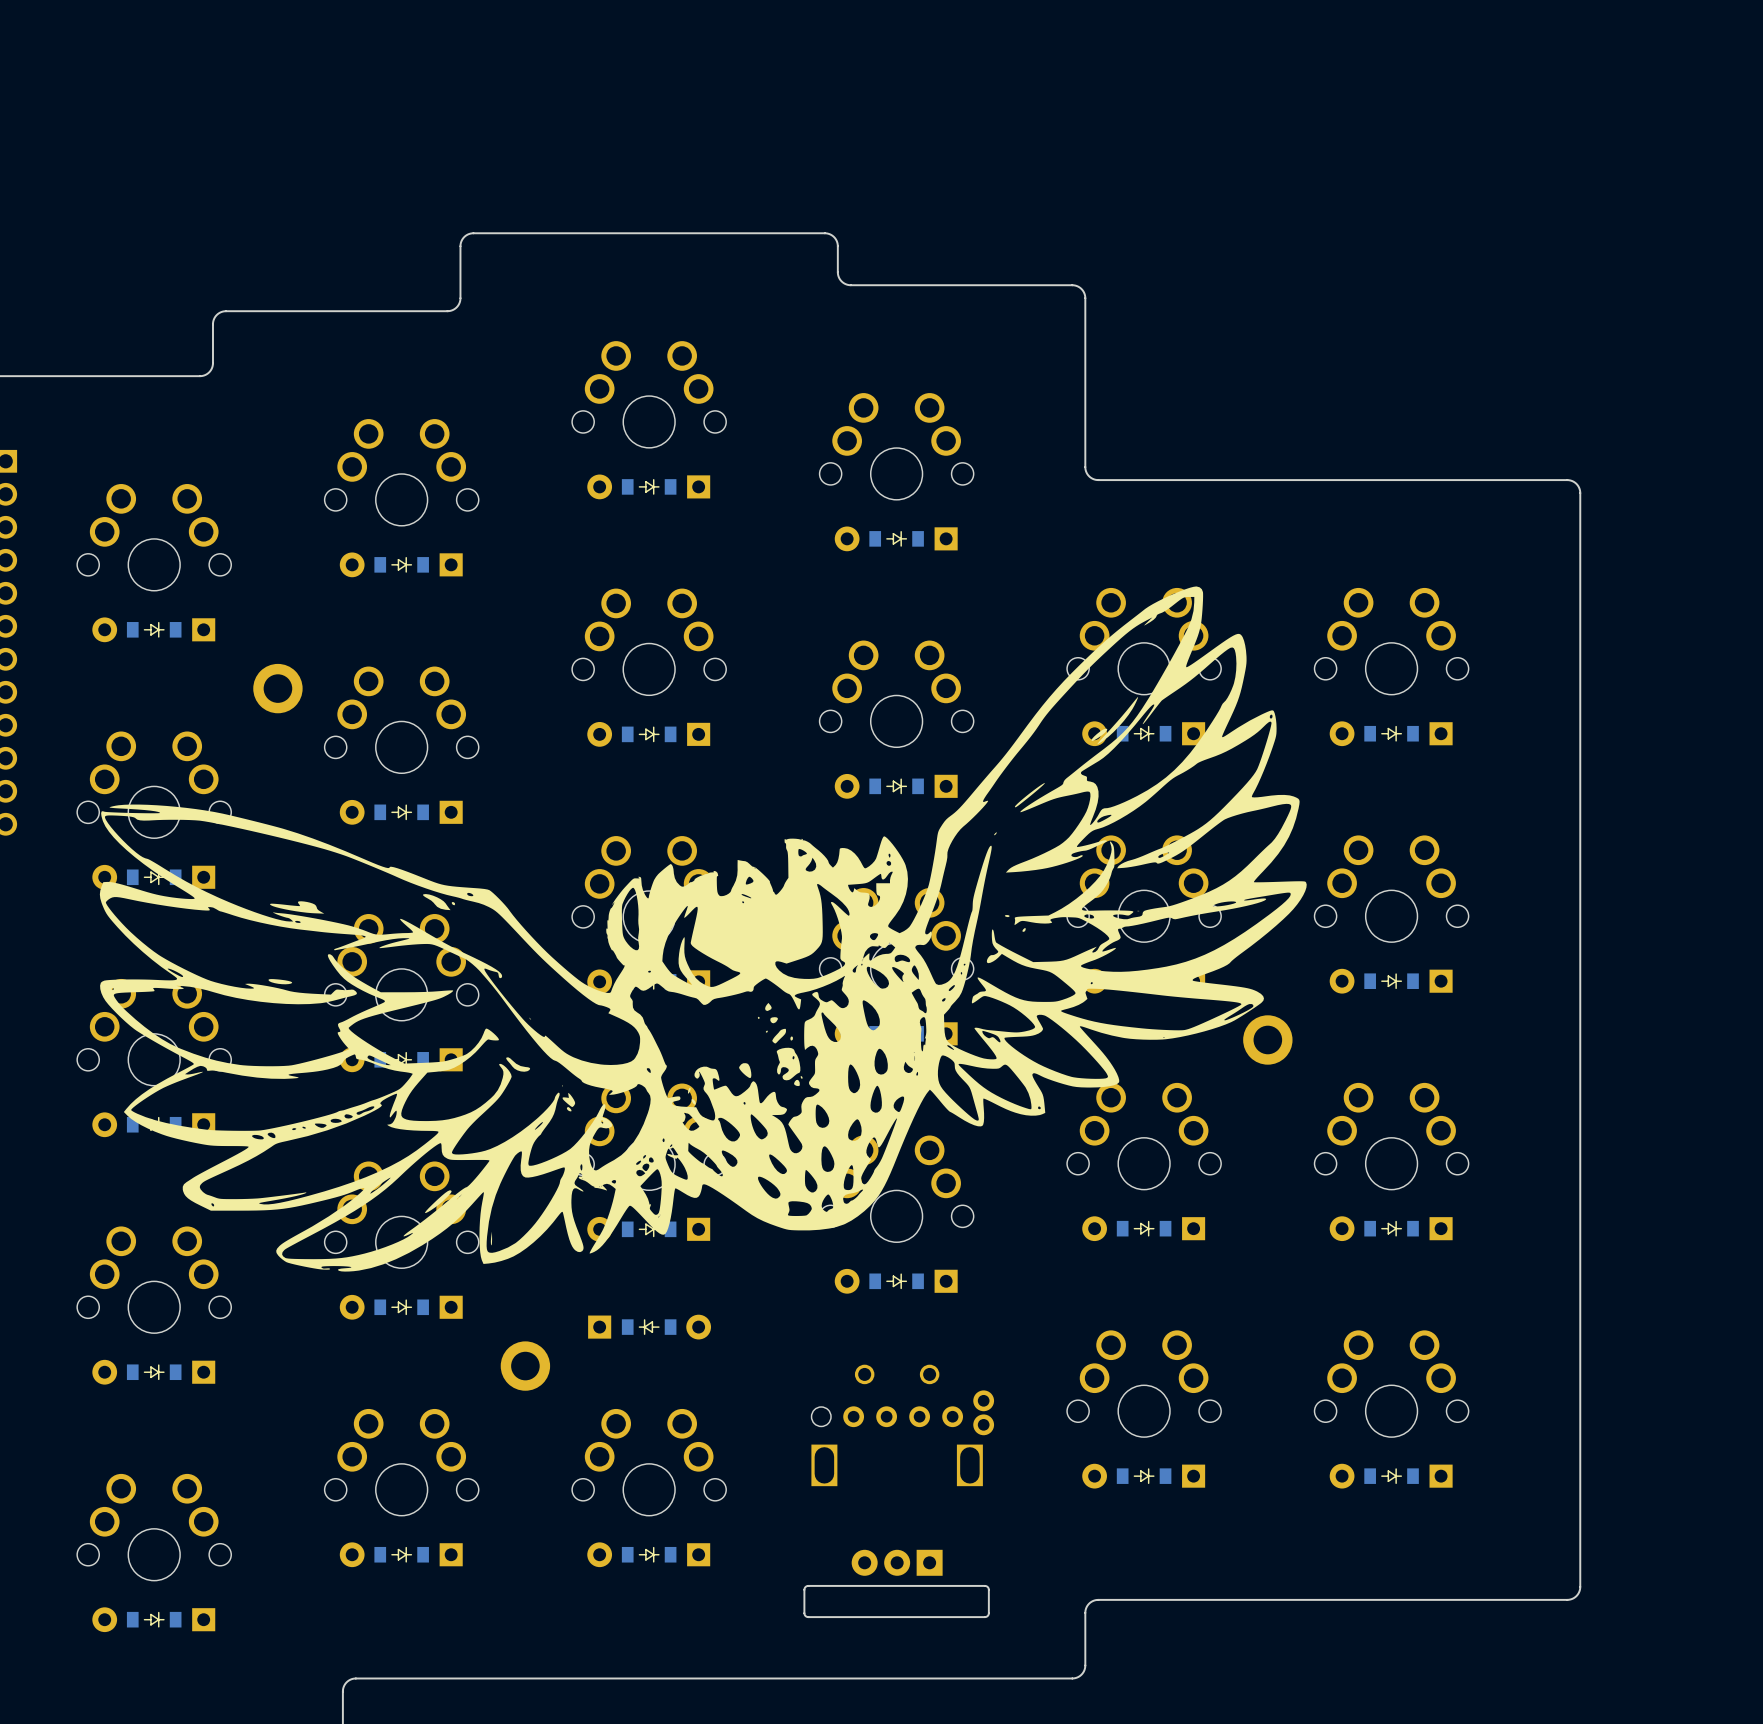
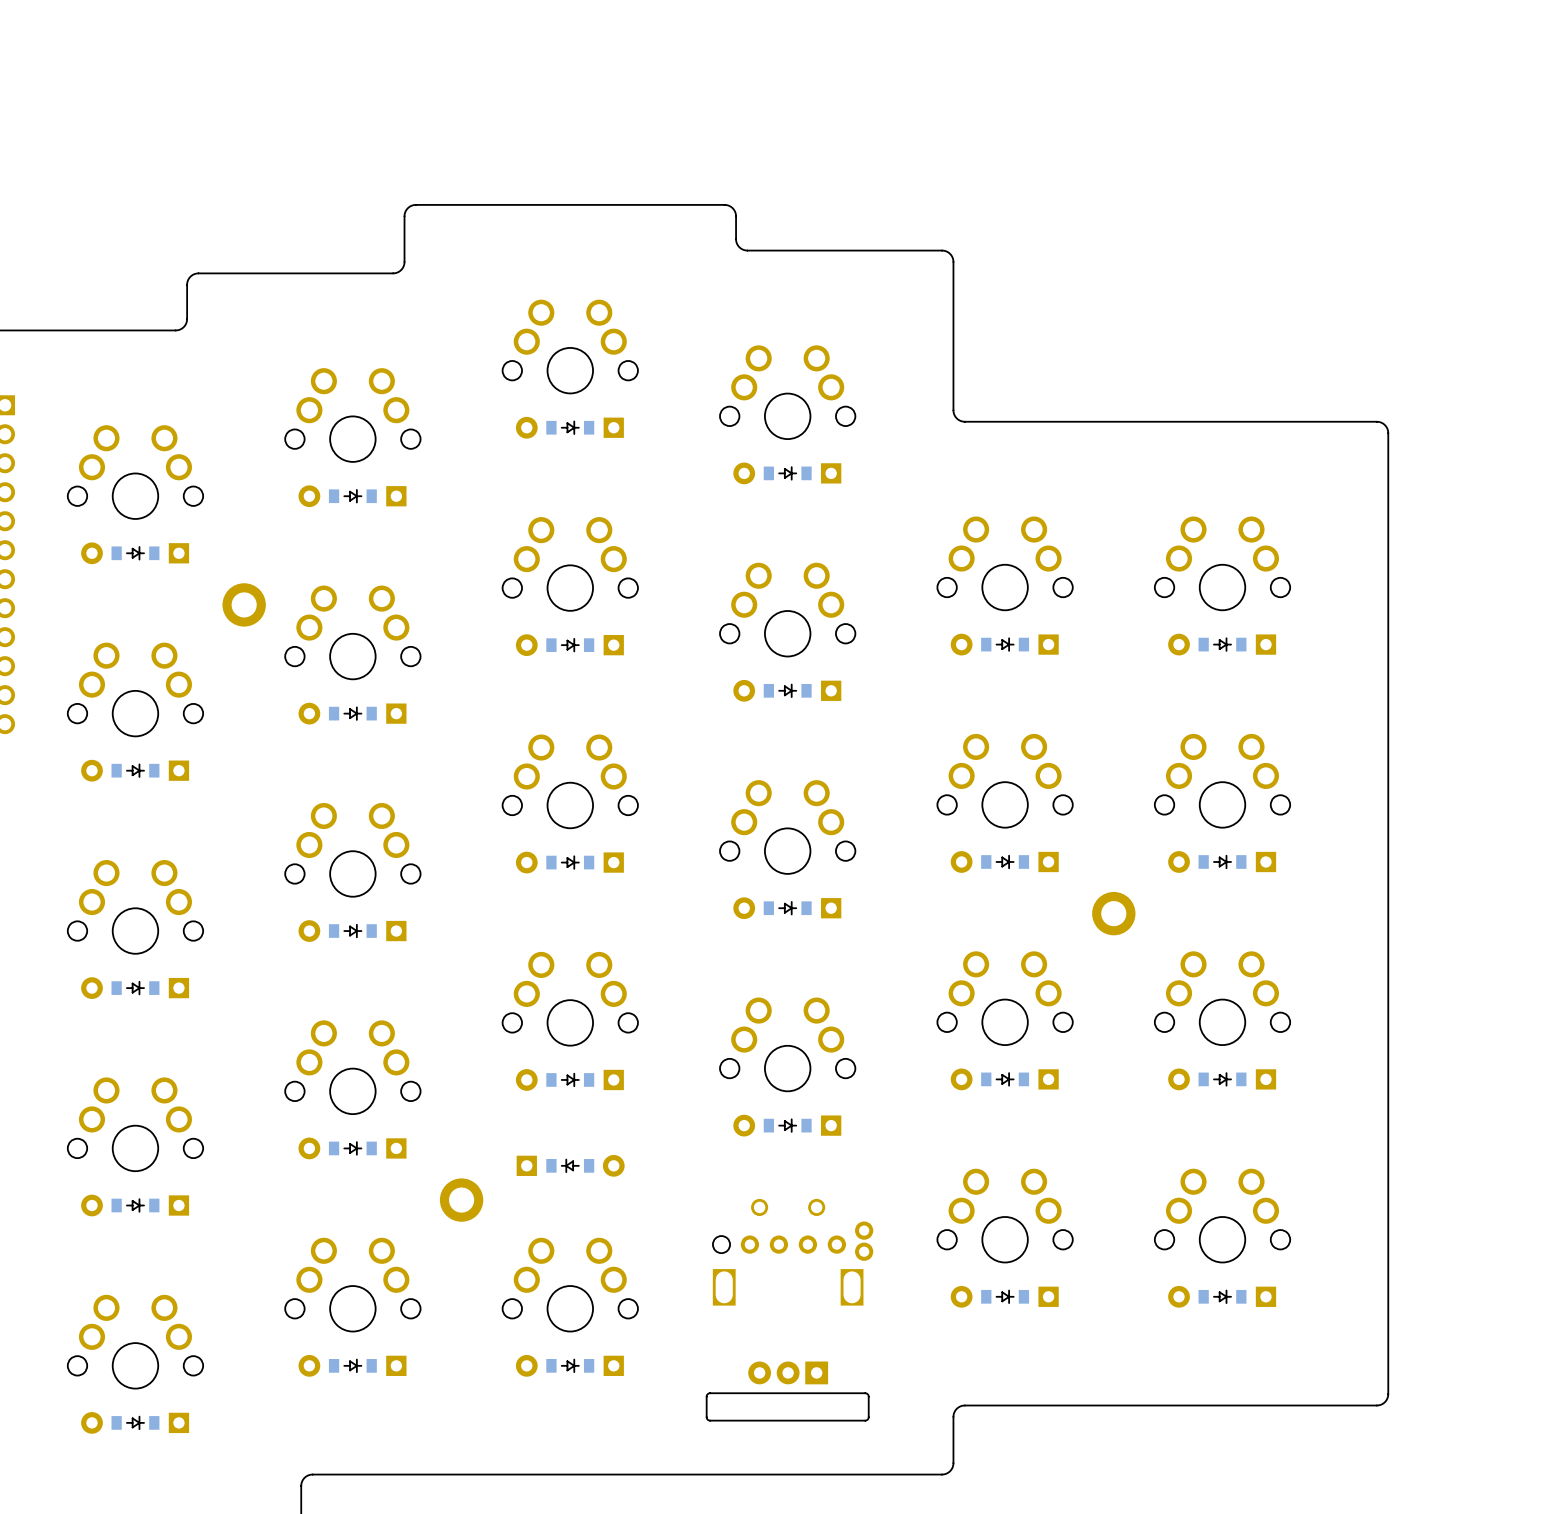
drawing: [99, 586, 1307, 1272] -> none

